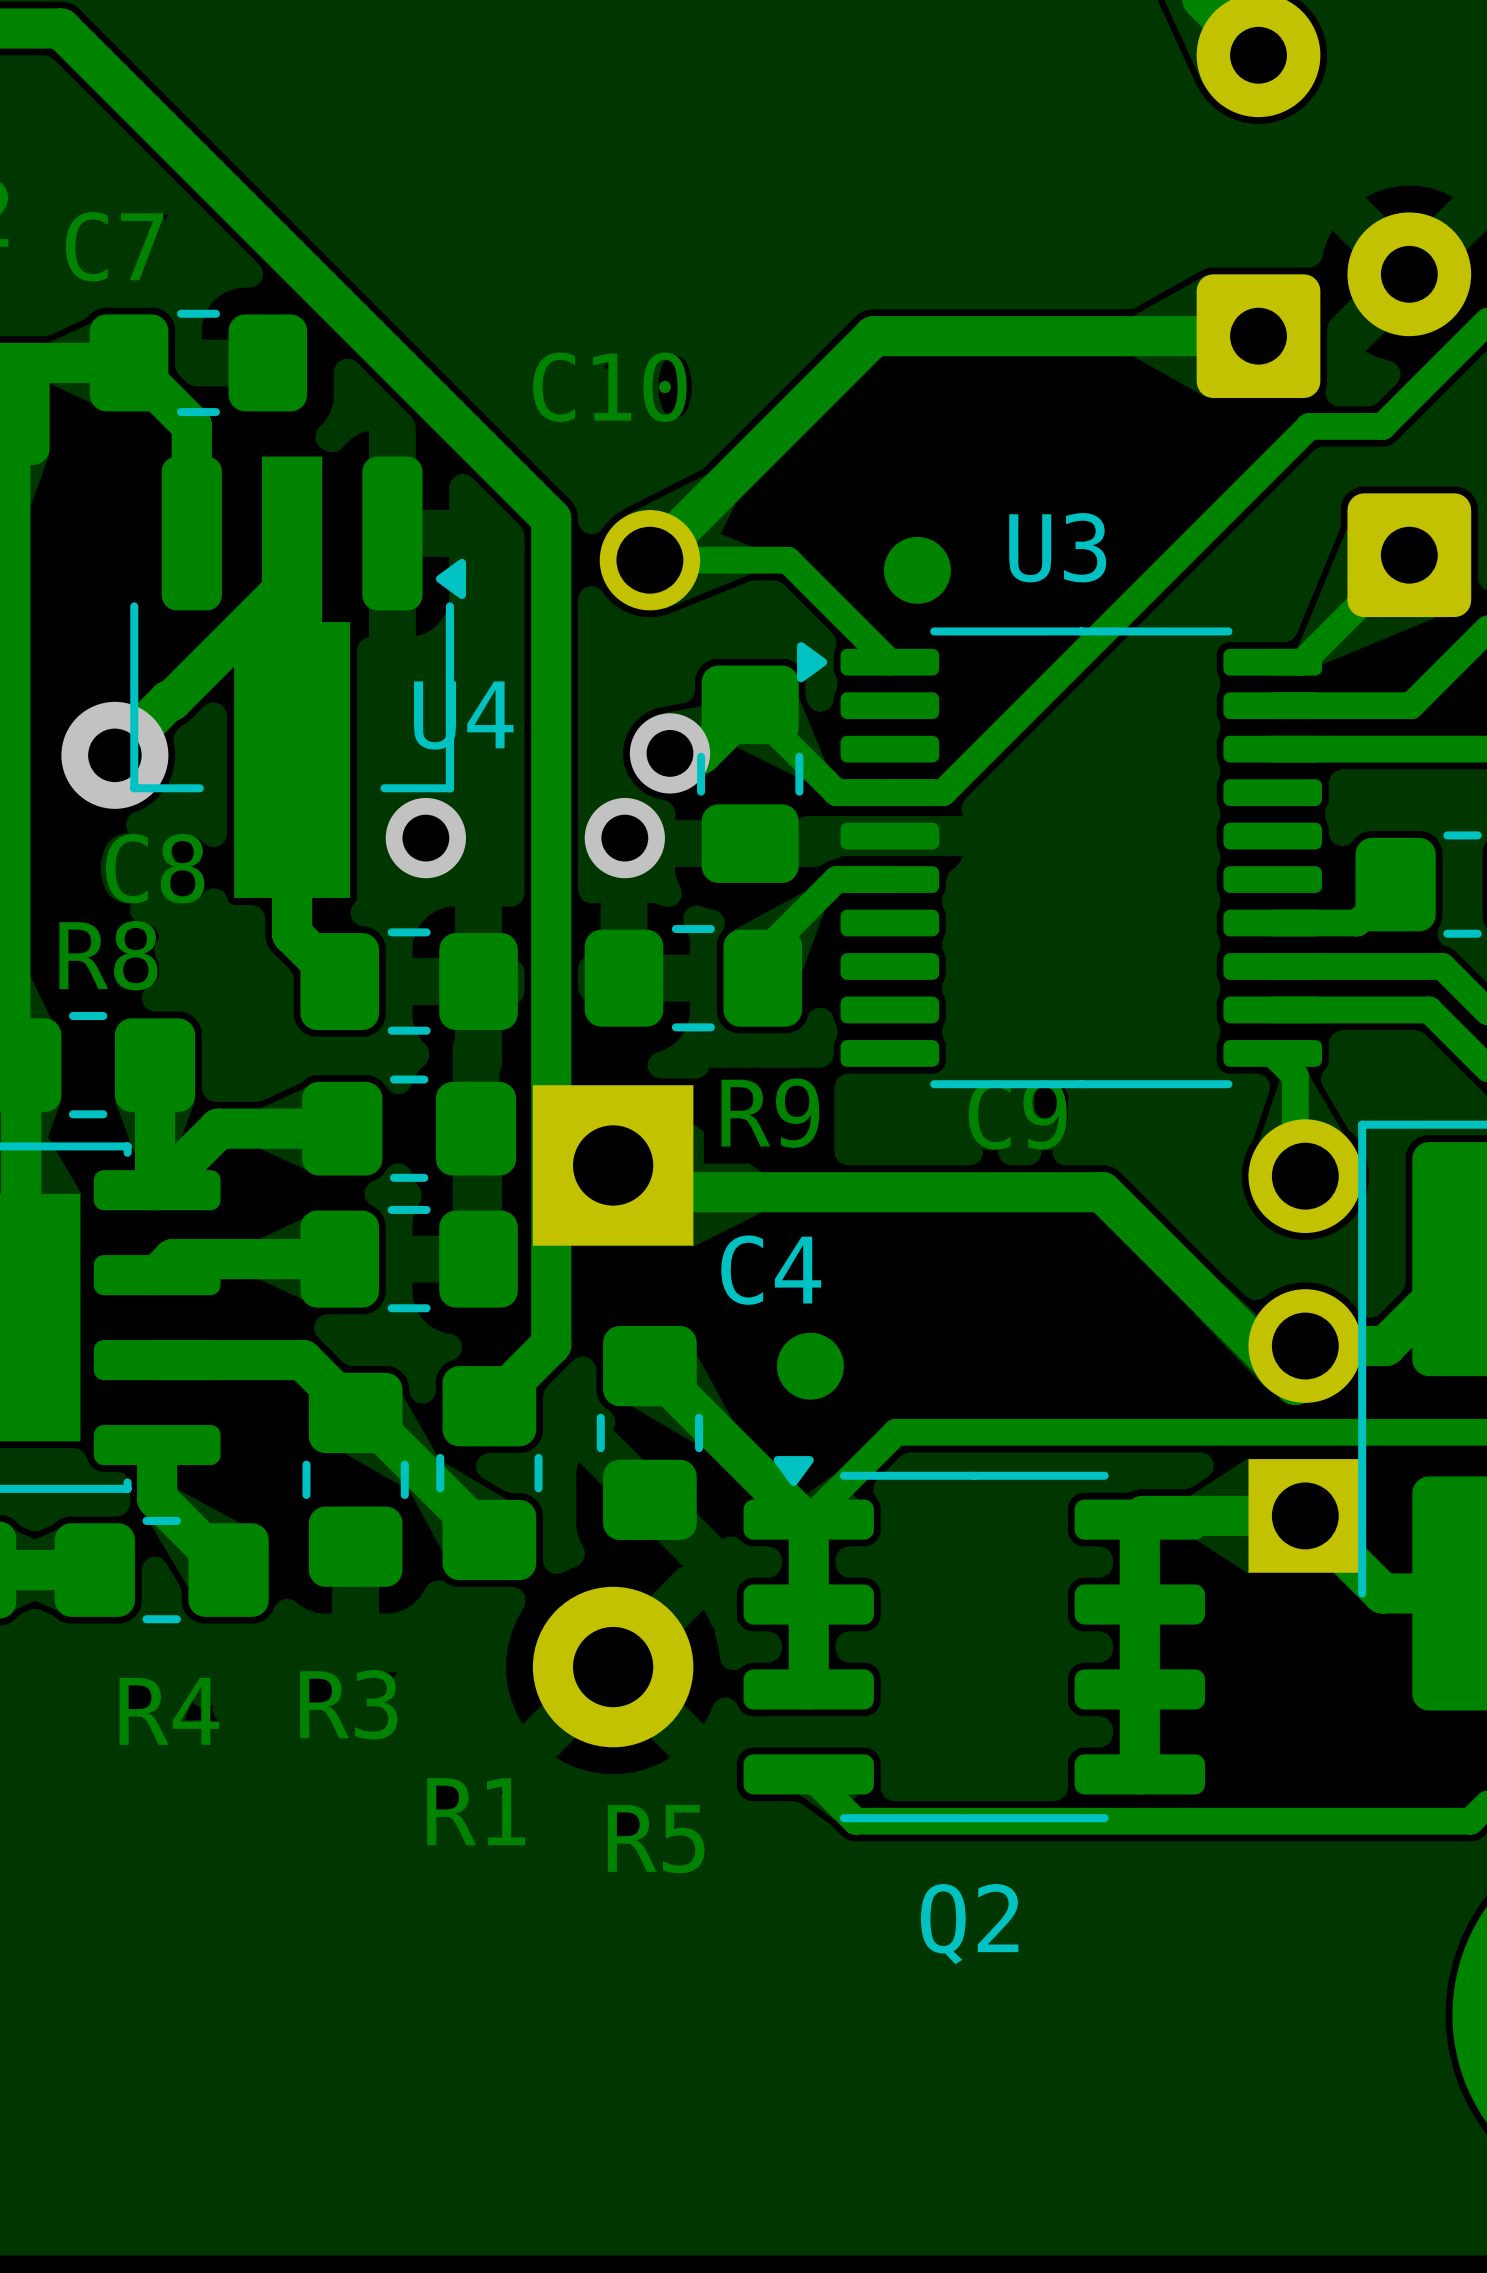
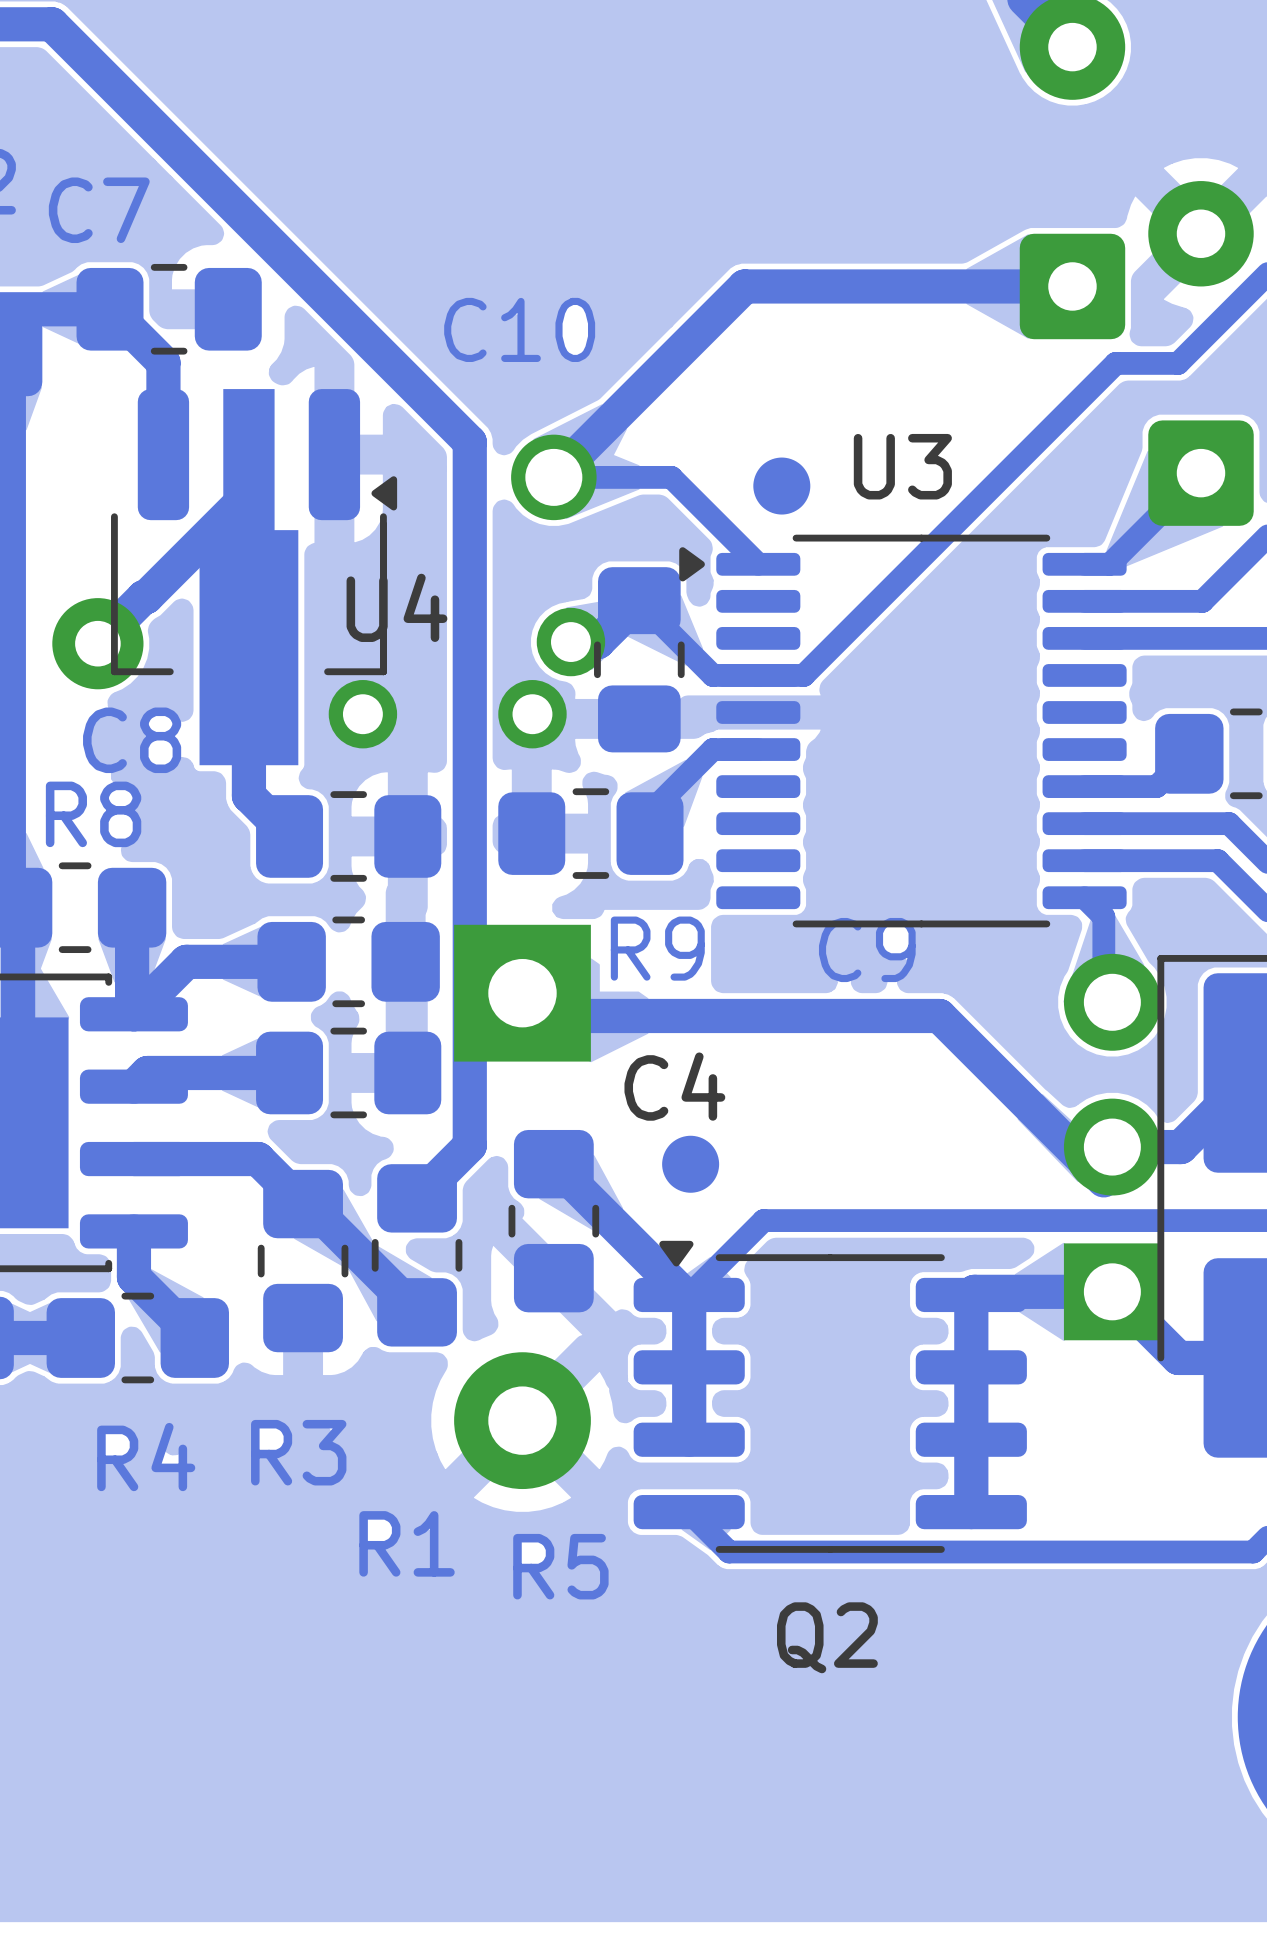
C4 name position: C4 (771, 1270) -> C4 (674, 1086)

